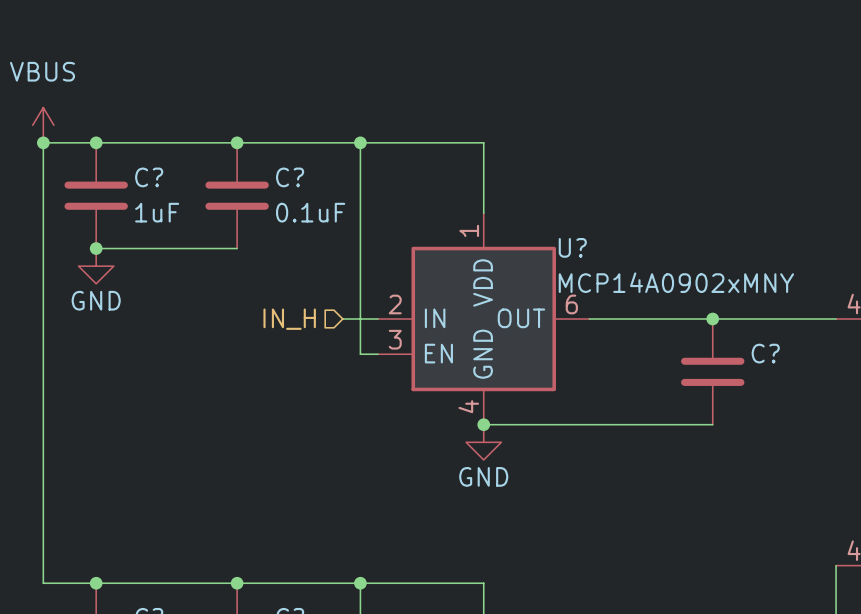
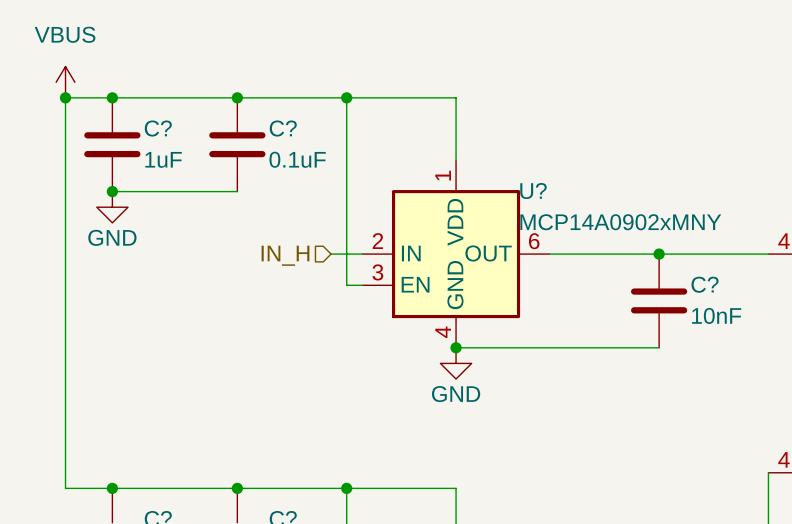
C? value: none -> 10nF (716, 315)

